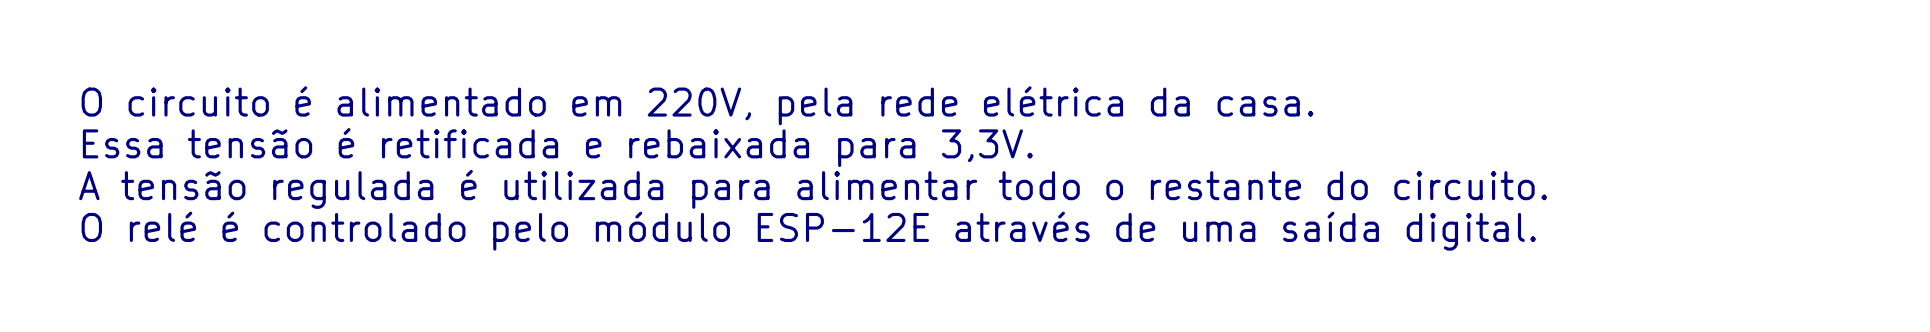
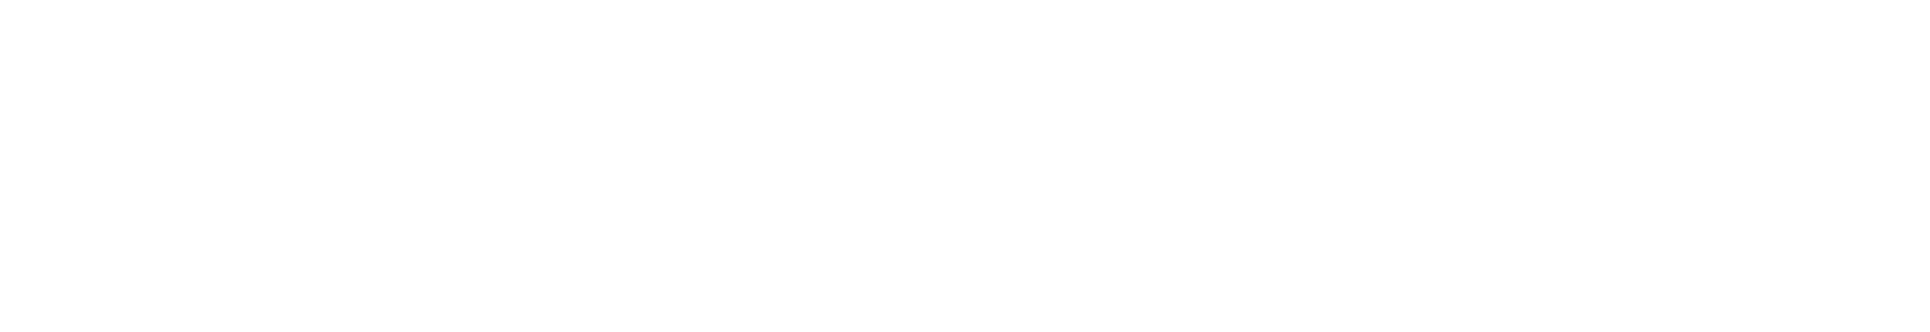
text: O circuito é alimentado em 220V, pela rede elétrica da casa. (697, 105) -> none
text: Essa tensão é retificada e rebaixada para 3,3V. (557, 147) -> none
text: A tensão regulada é utilizada para alimentar todo o restante do circuito. (813, 189) -> none
text: O relé é controlado pelo módulo ESP-12E através de uma saída digital. (808, 231) -> none

